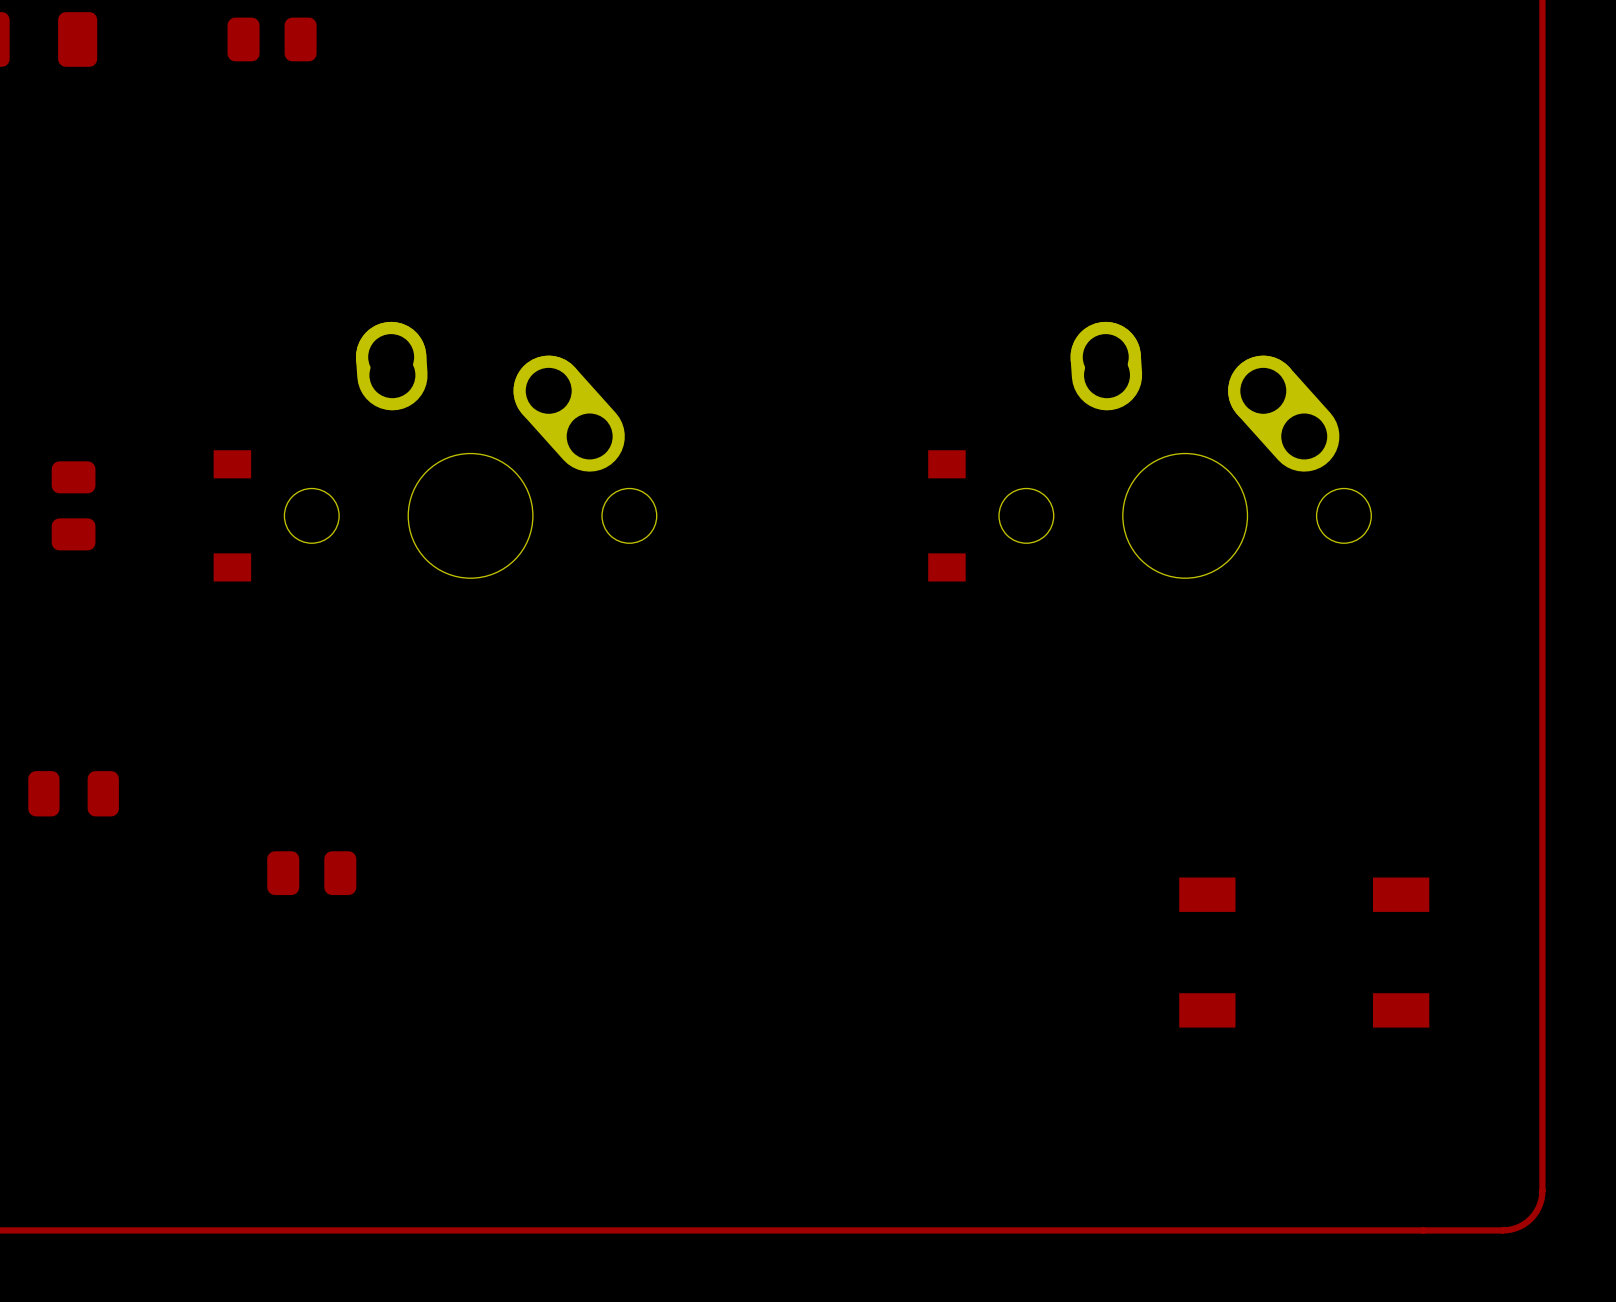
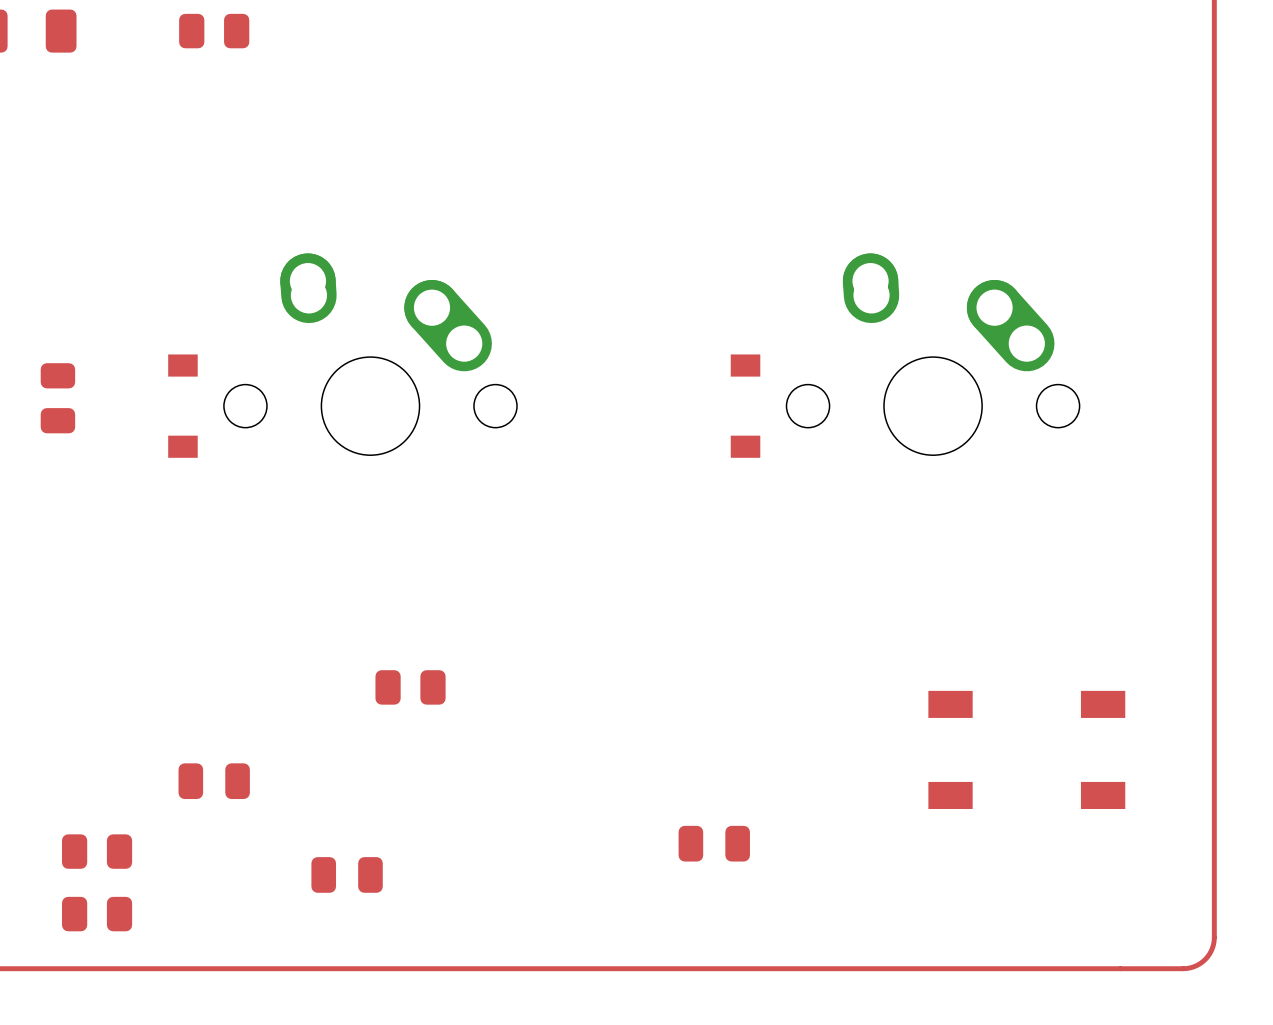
part: (73, 793) -> none
part: (311, 873) -> none
part: none -> (410, 687)
part: none -> (214, 781)
part: none -> (714, 843)
part: none -> (97, 851)
part: none -> (347, 874)
part: none -> (97, 914)

